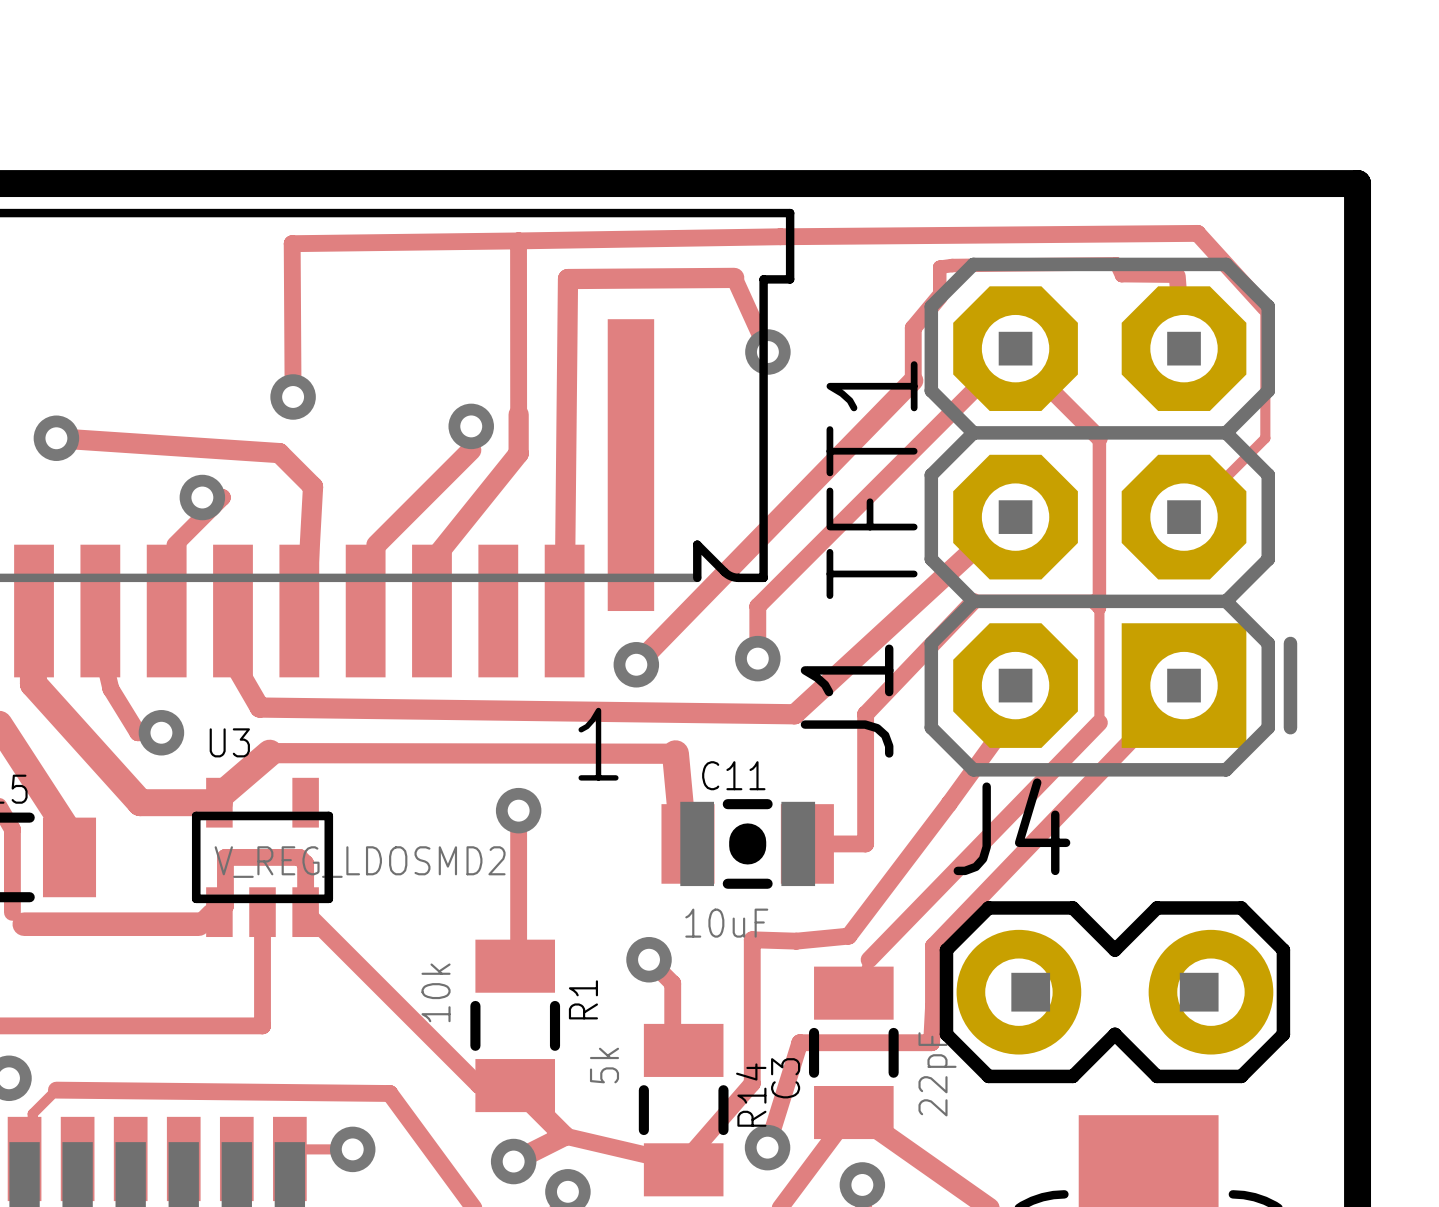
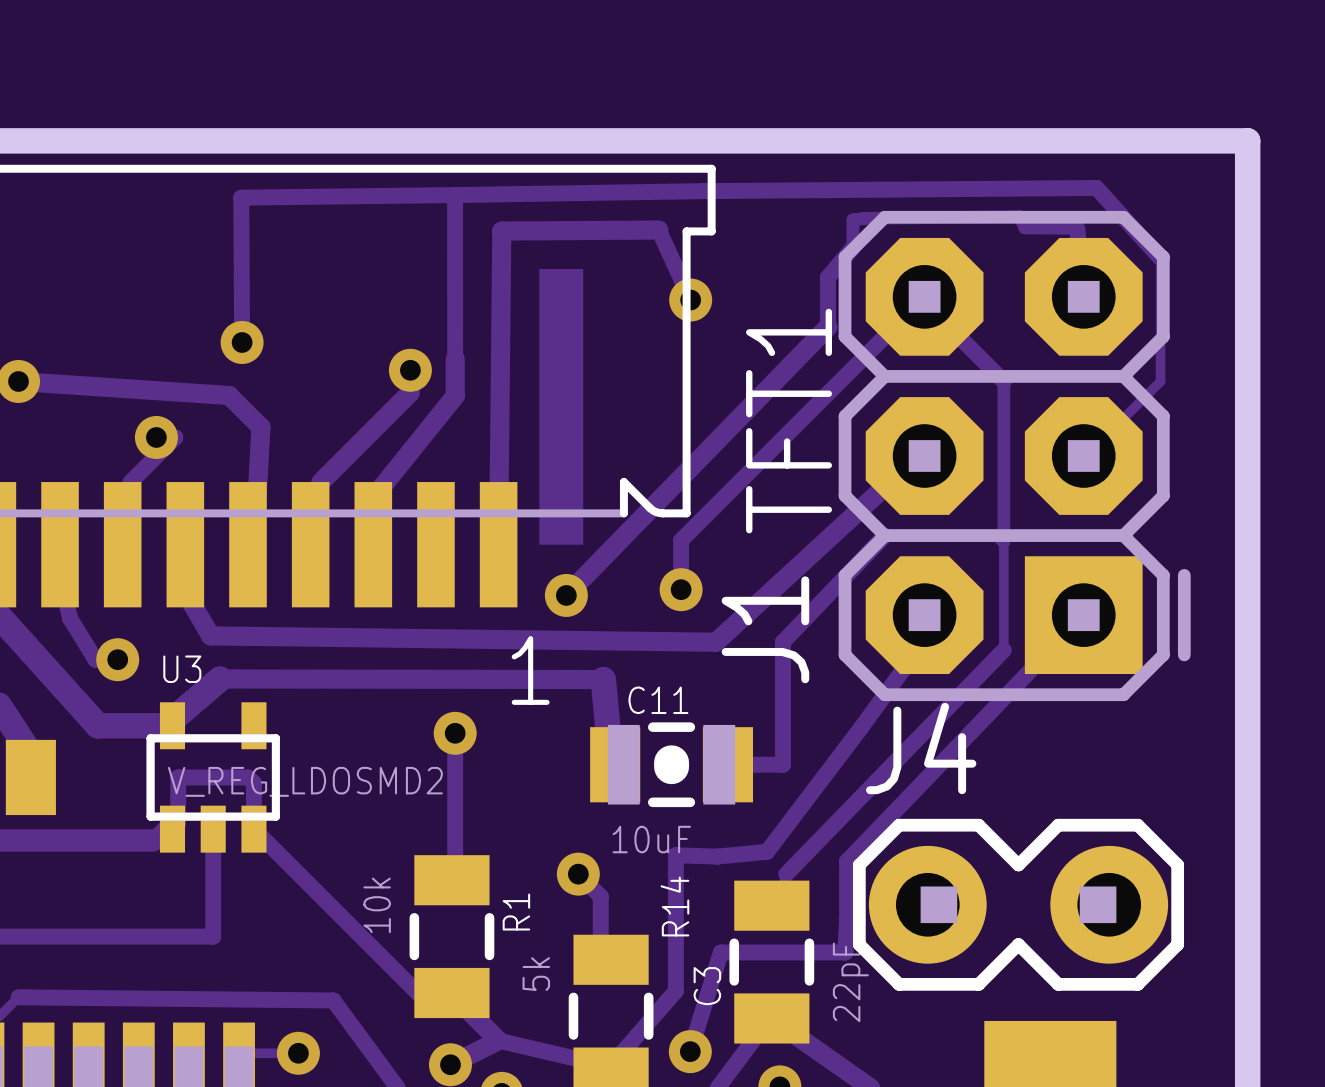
R14 name position: R14 (751, 1095) -> R14 (674, 906)

